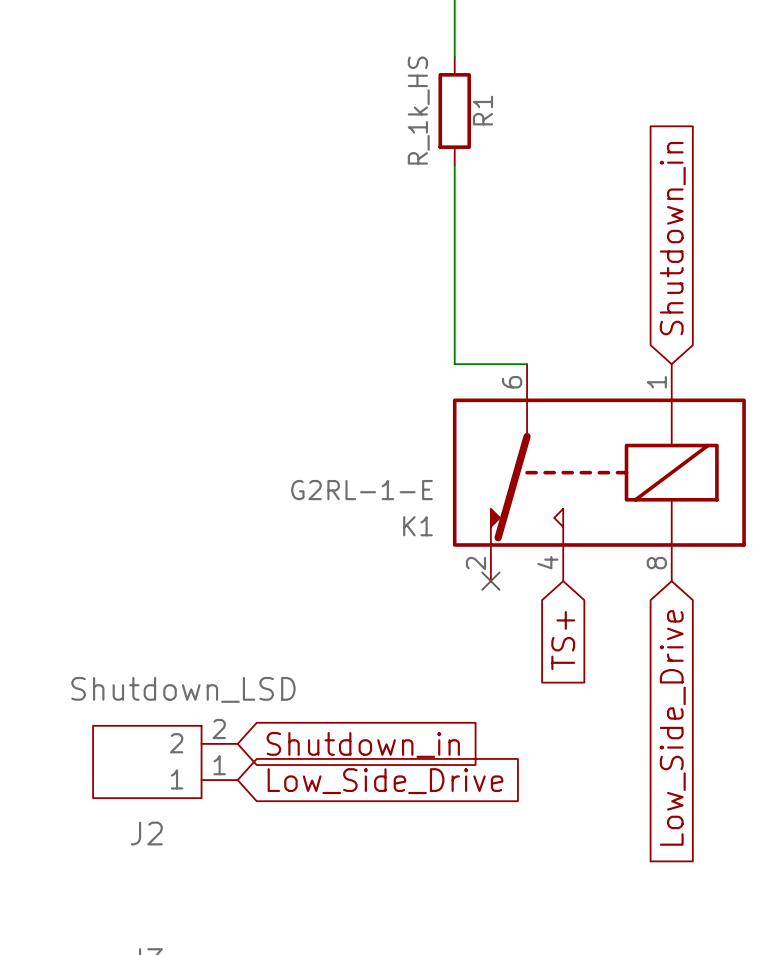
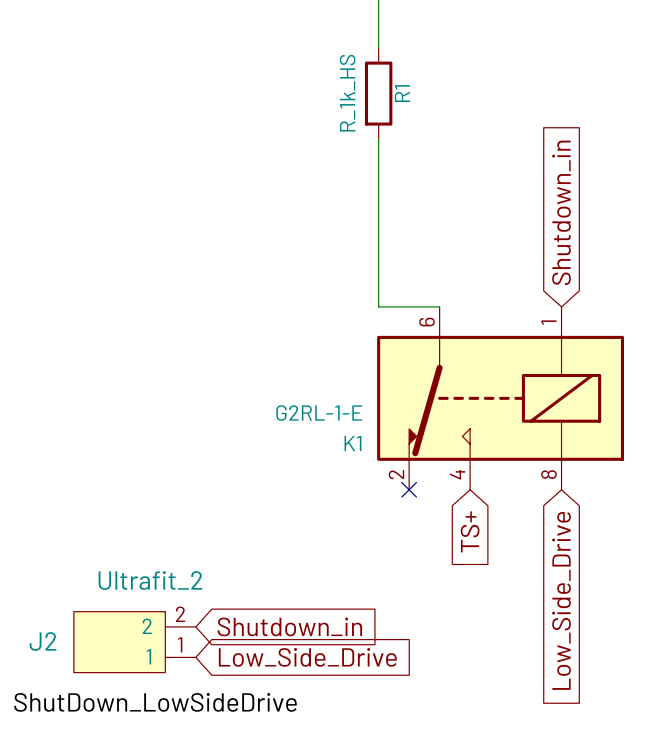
J2 value: Shutdown_LSD (183, 689) -> Ultrafit_2 (150, 580)
J2 name position: J2 (146, 833) -> J2 (43, 641)
label: none -> ShutDown_LowSideDrive (155, 702)

